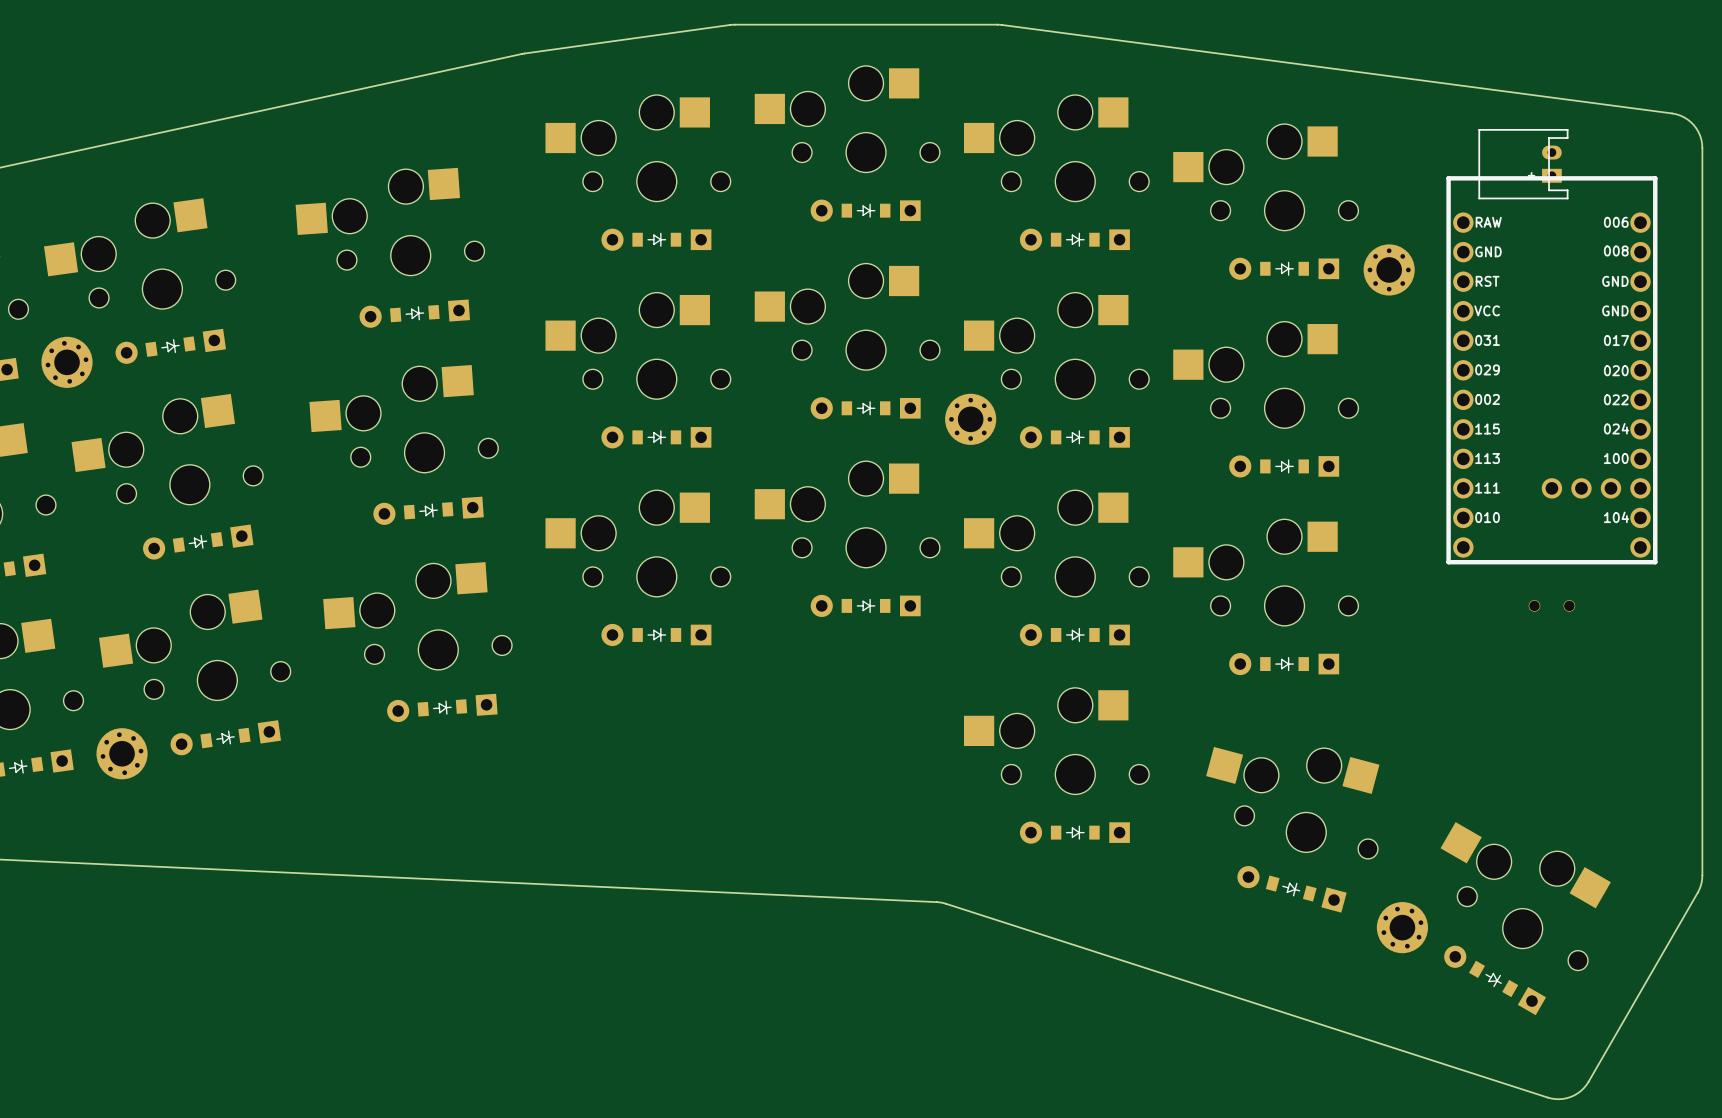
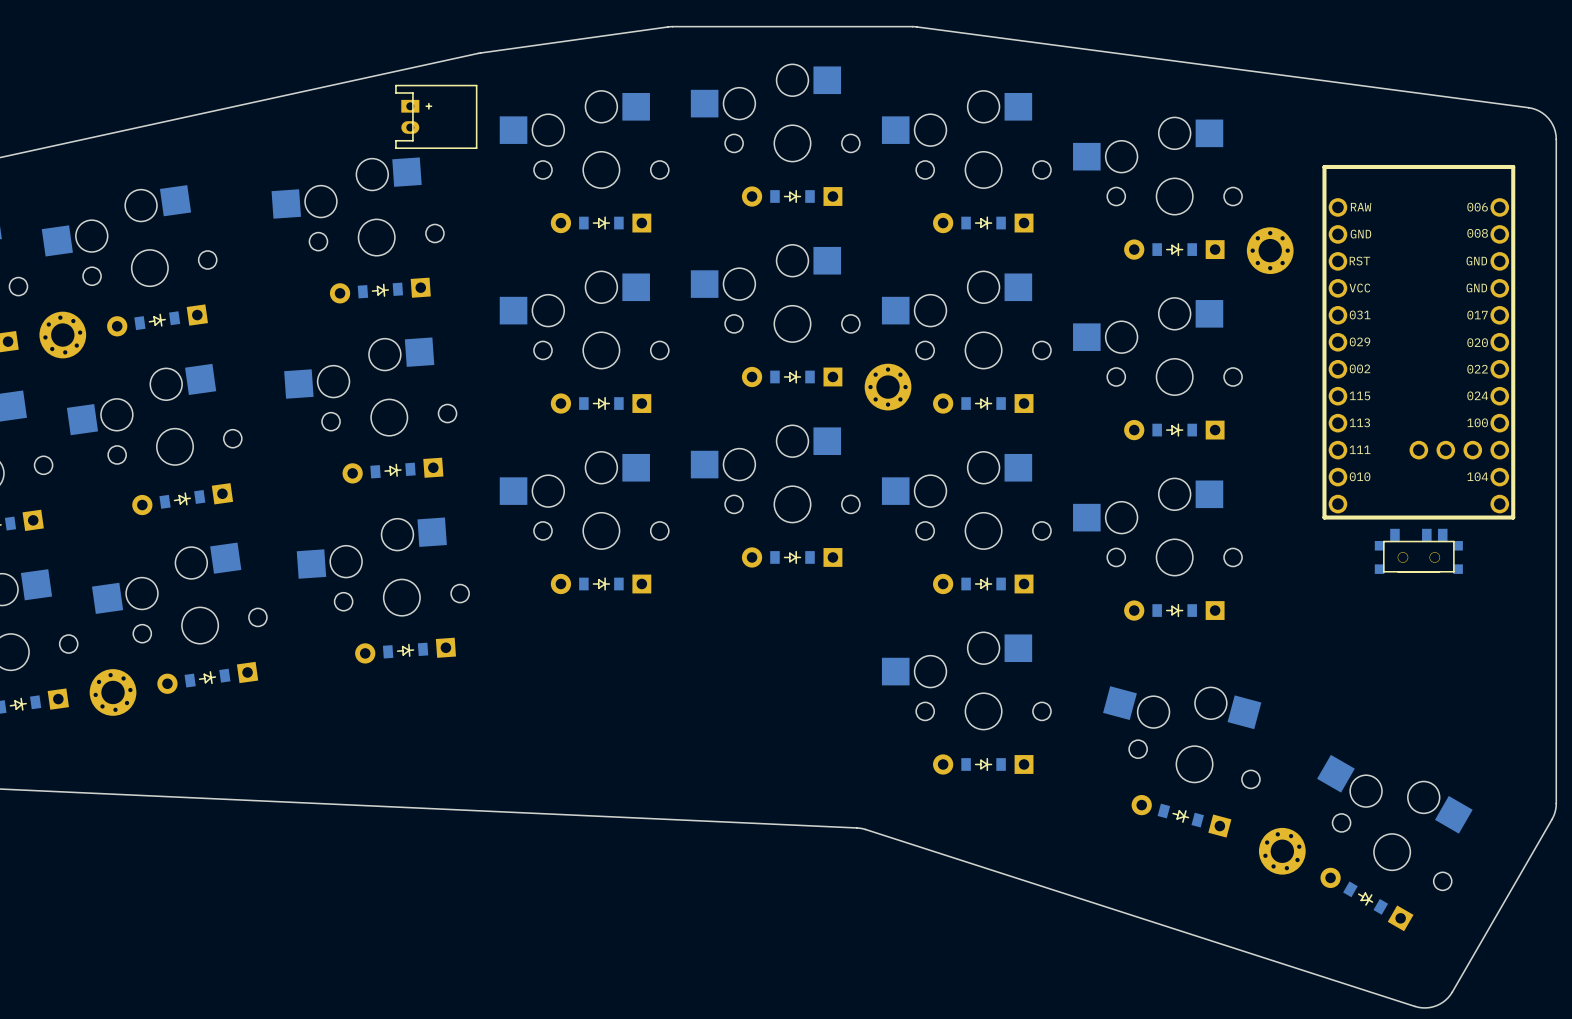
part: none -> (436, 116)
part: (1523, 164) -> none
part footprint: [1528, 600, 1576, 612] -> [1374, 528, 1463, 574]

